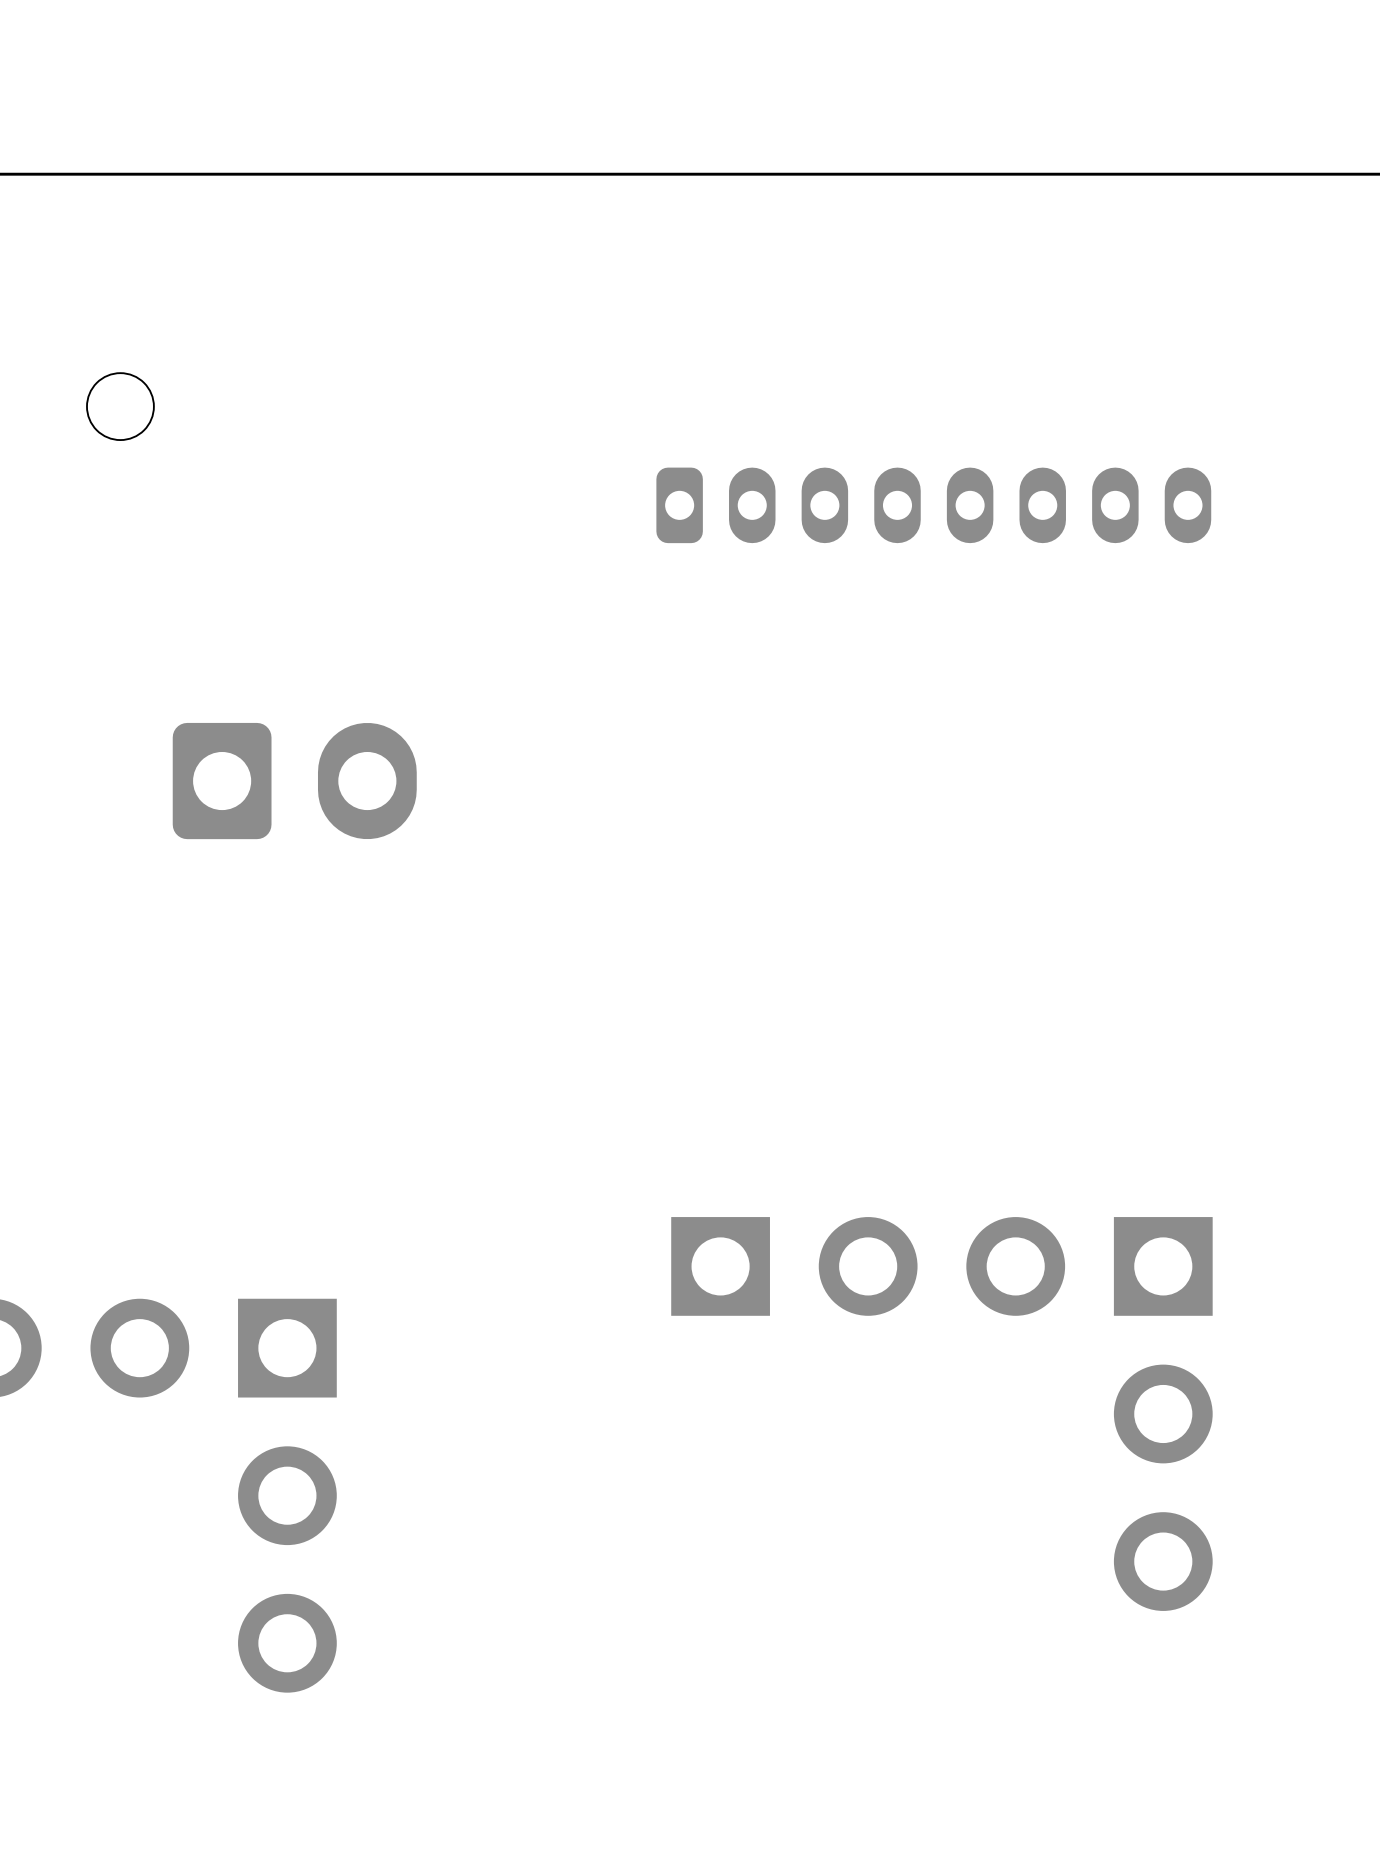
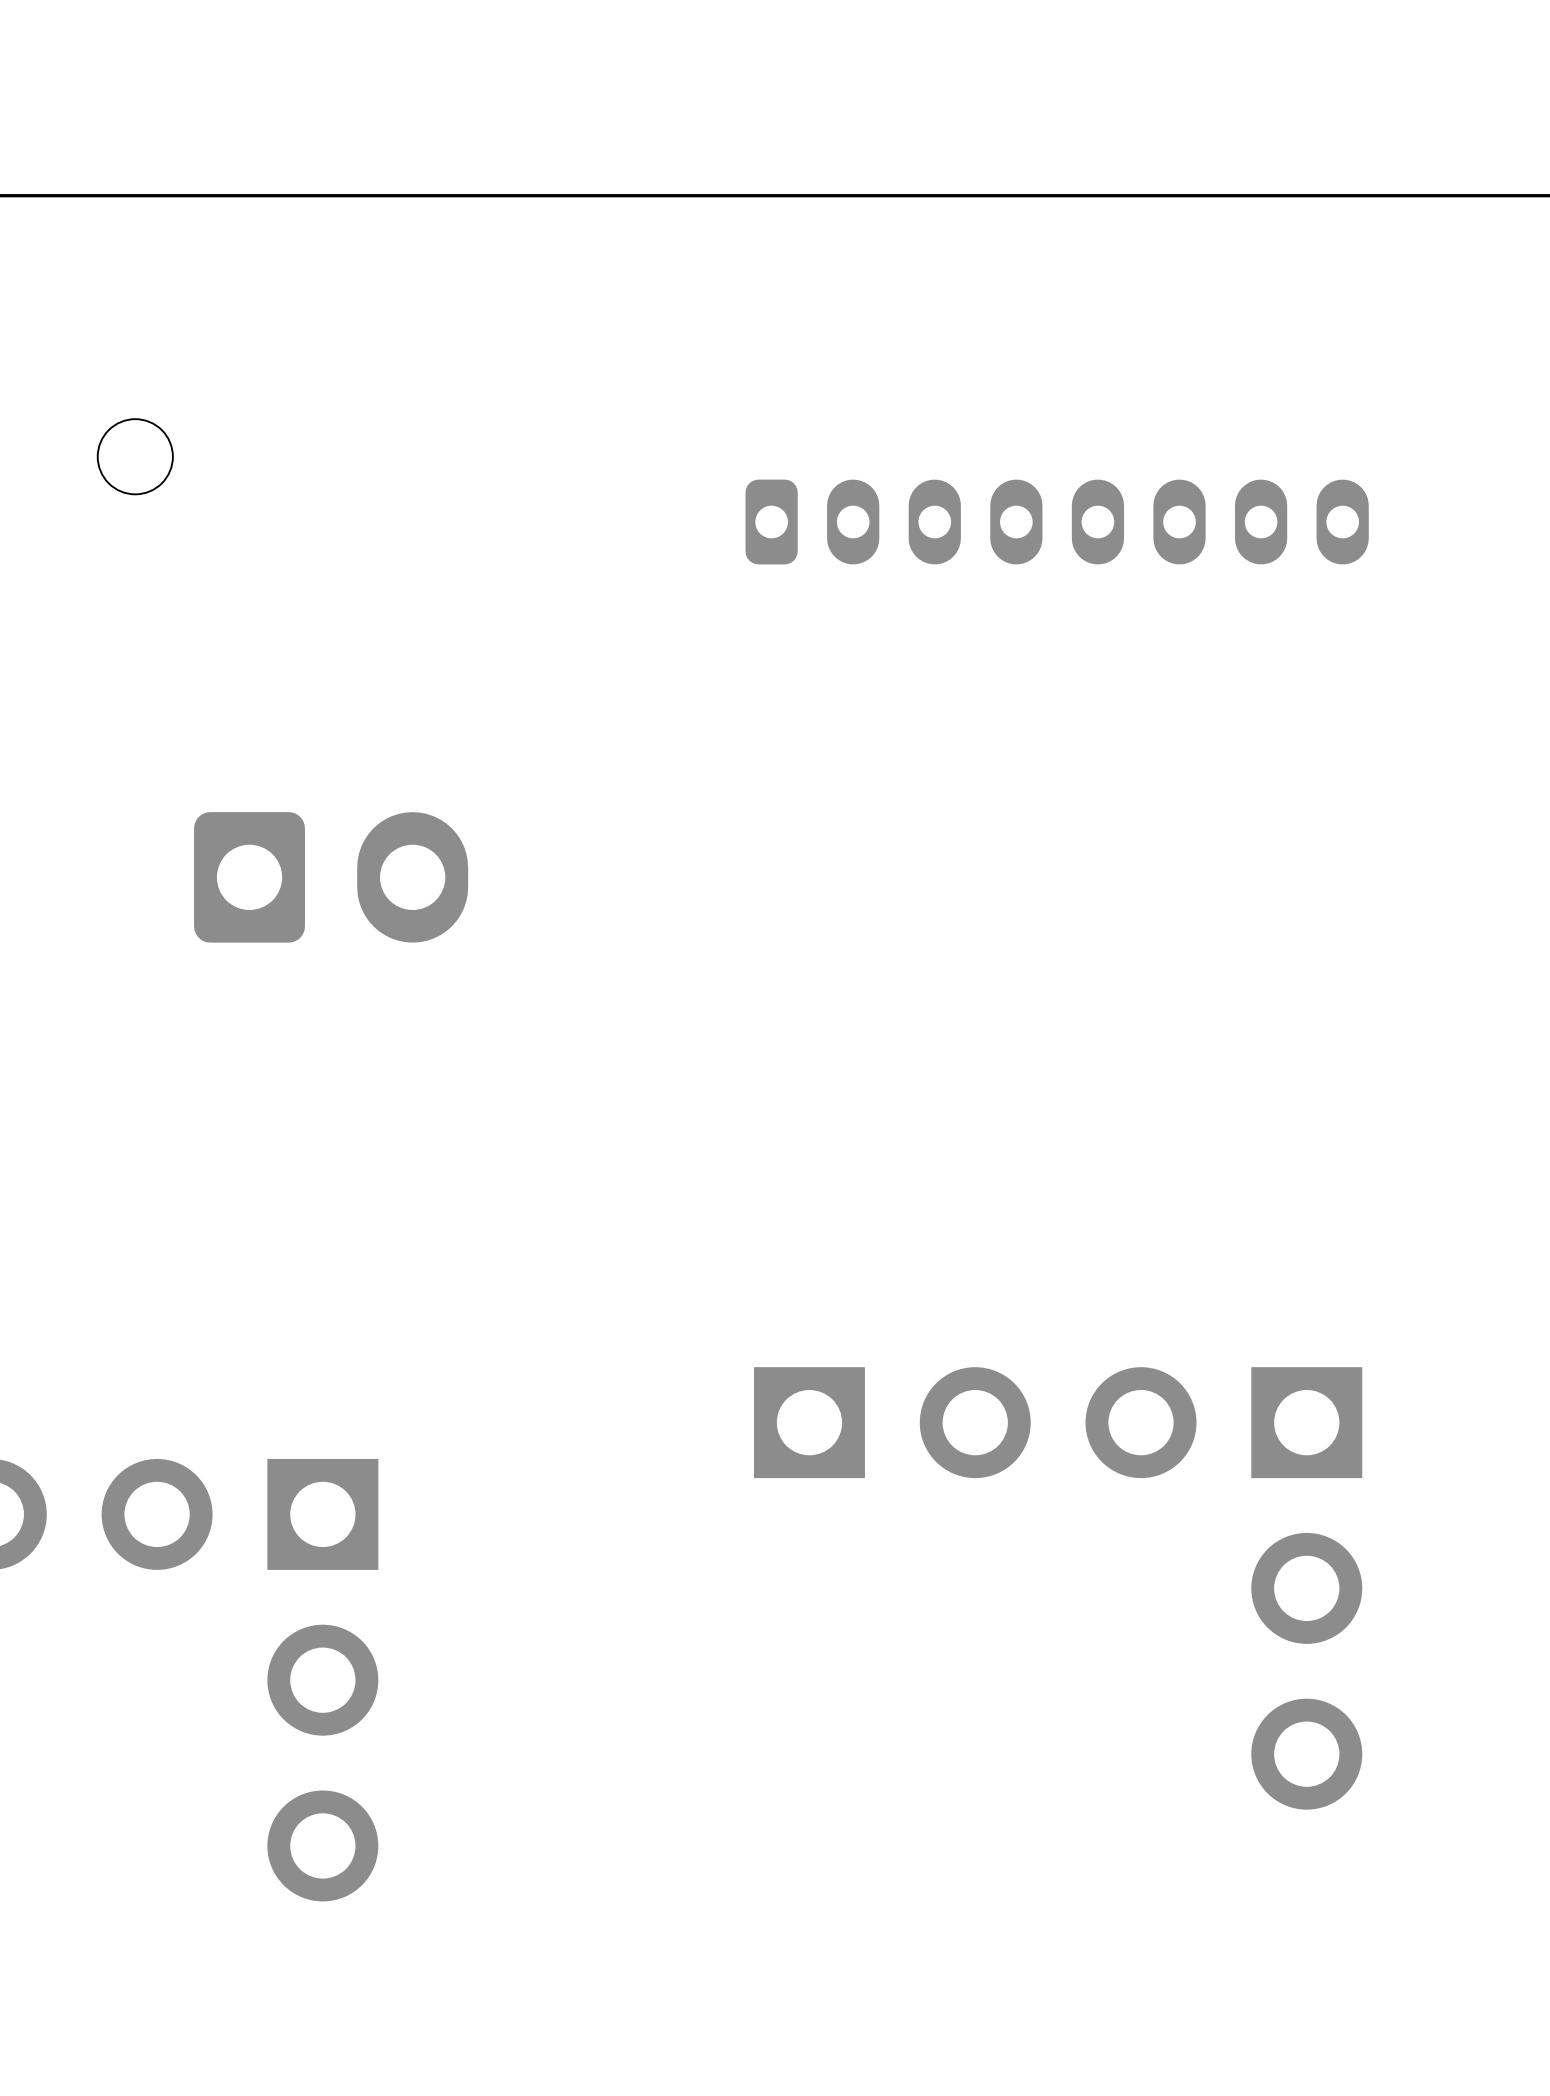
part position: (933, 505) -> (1057, 522)

